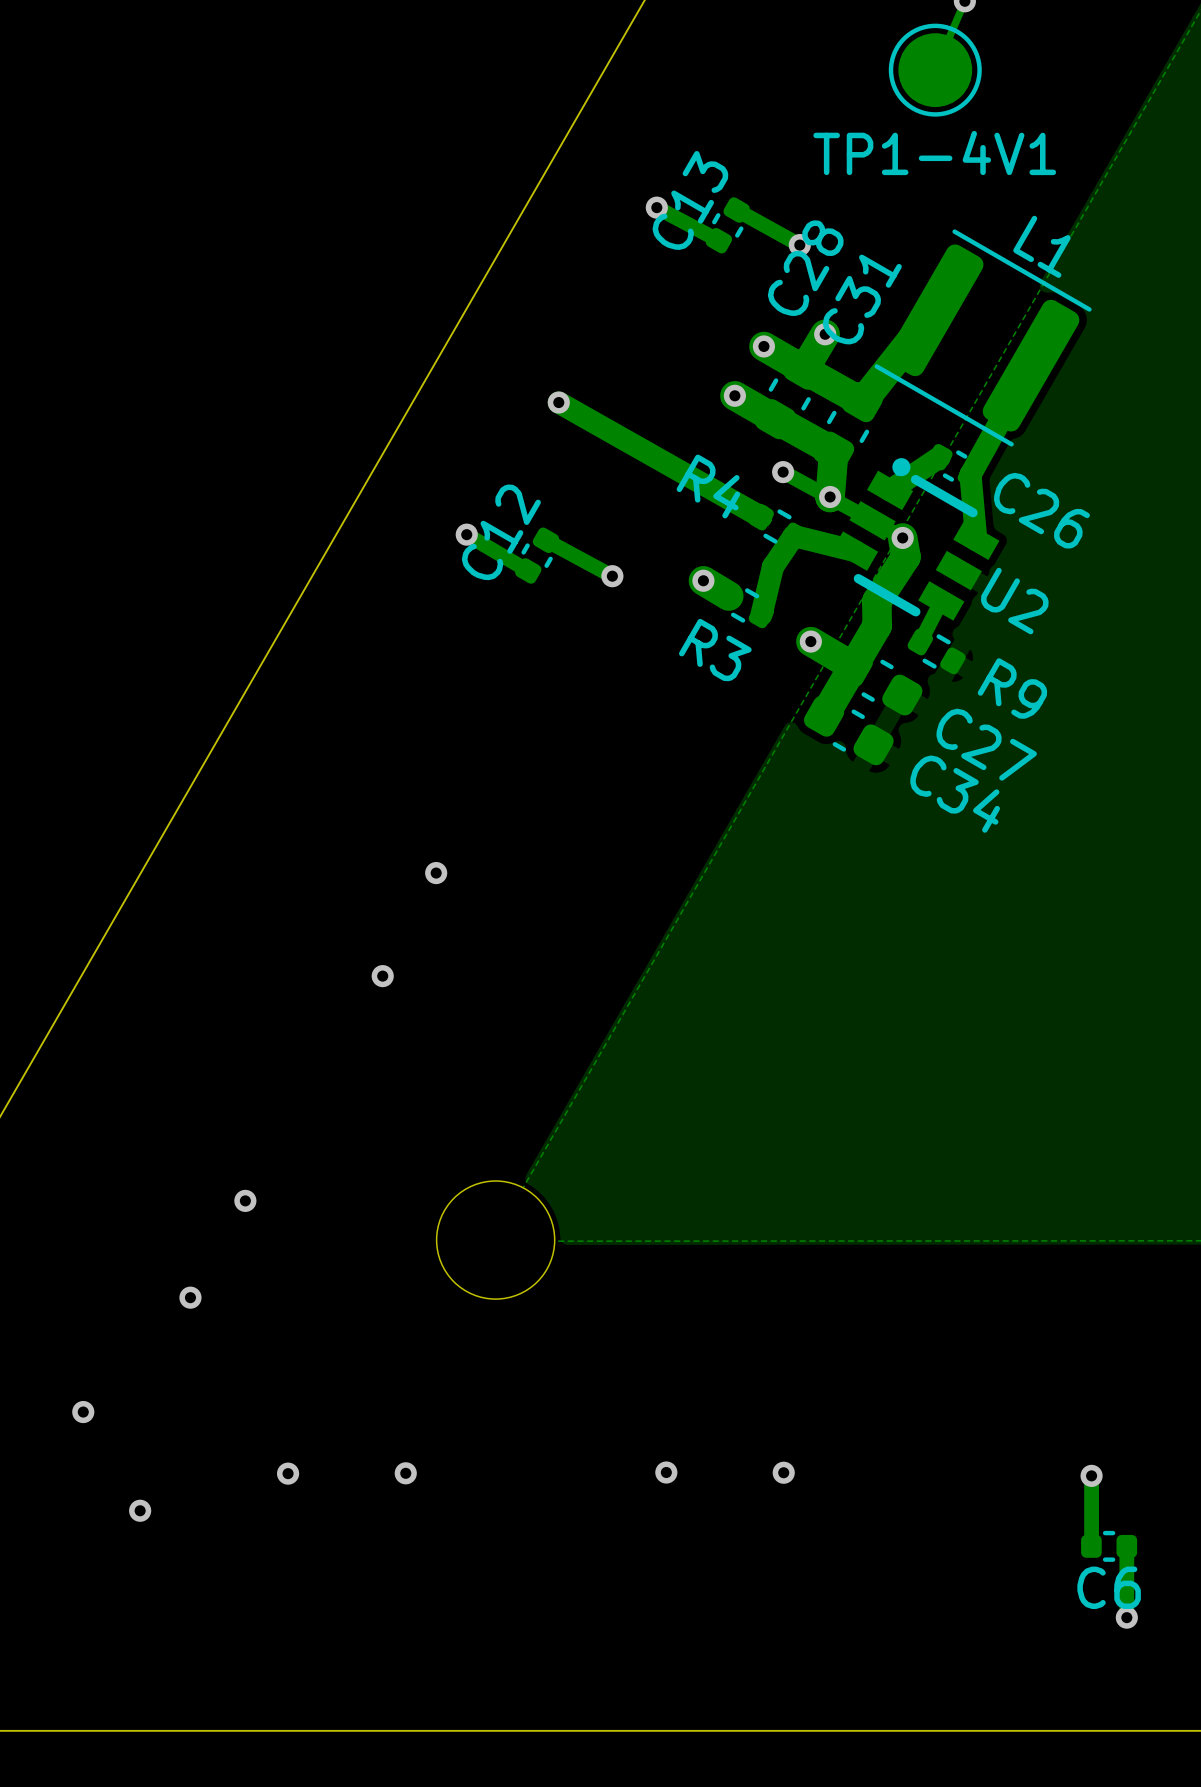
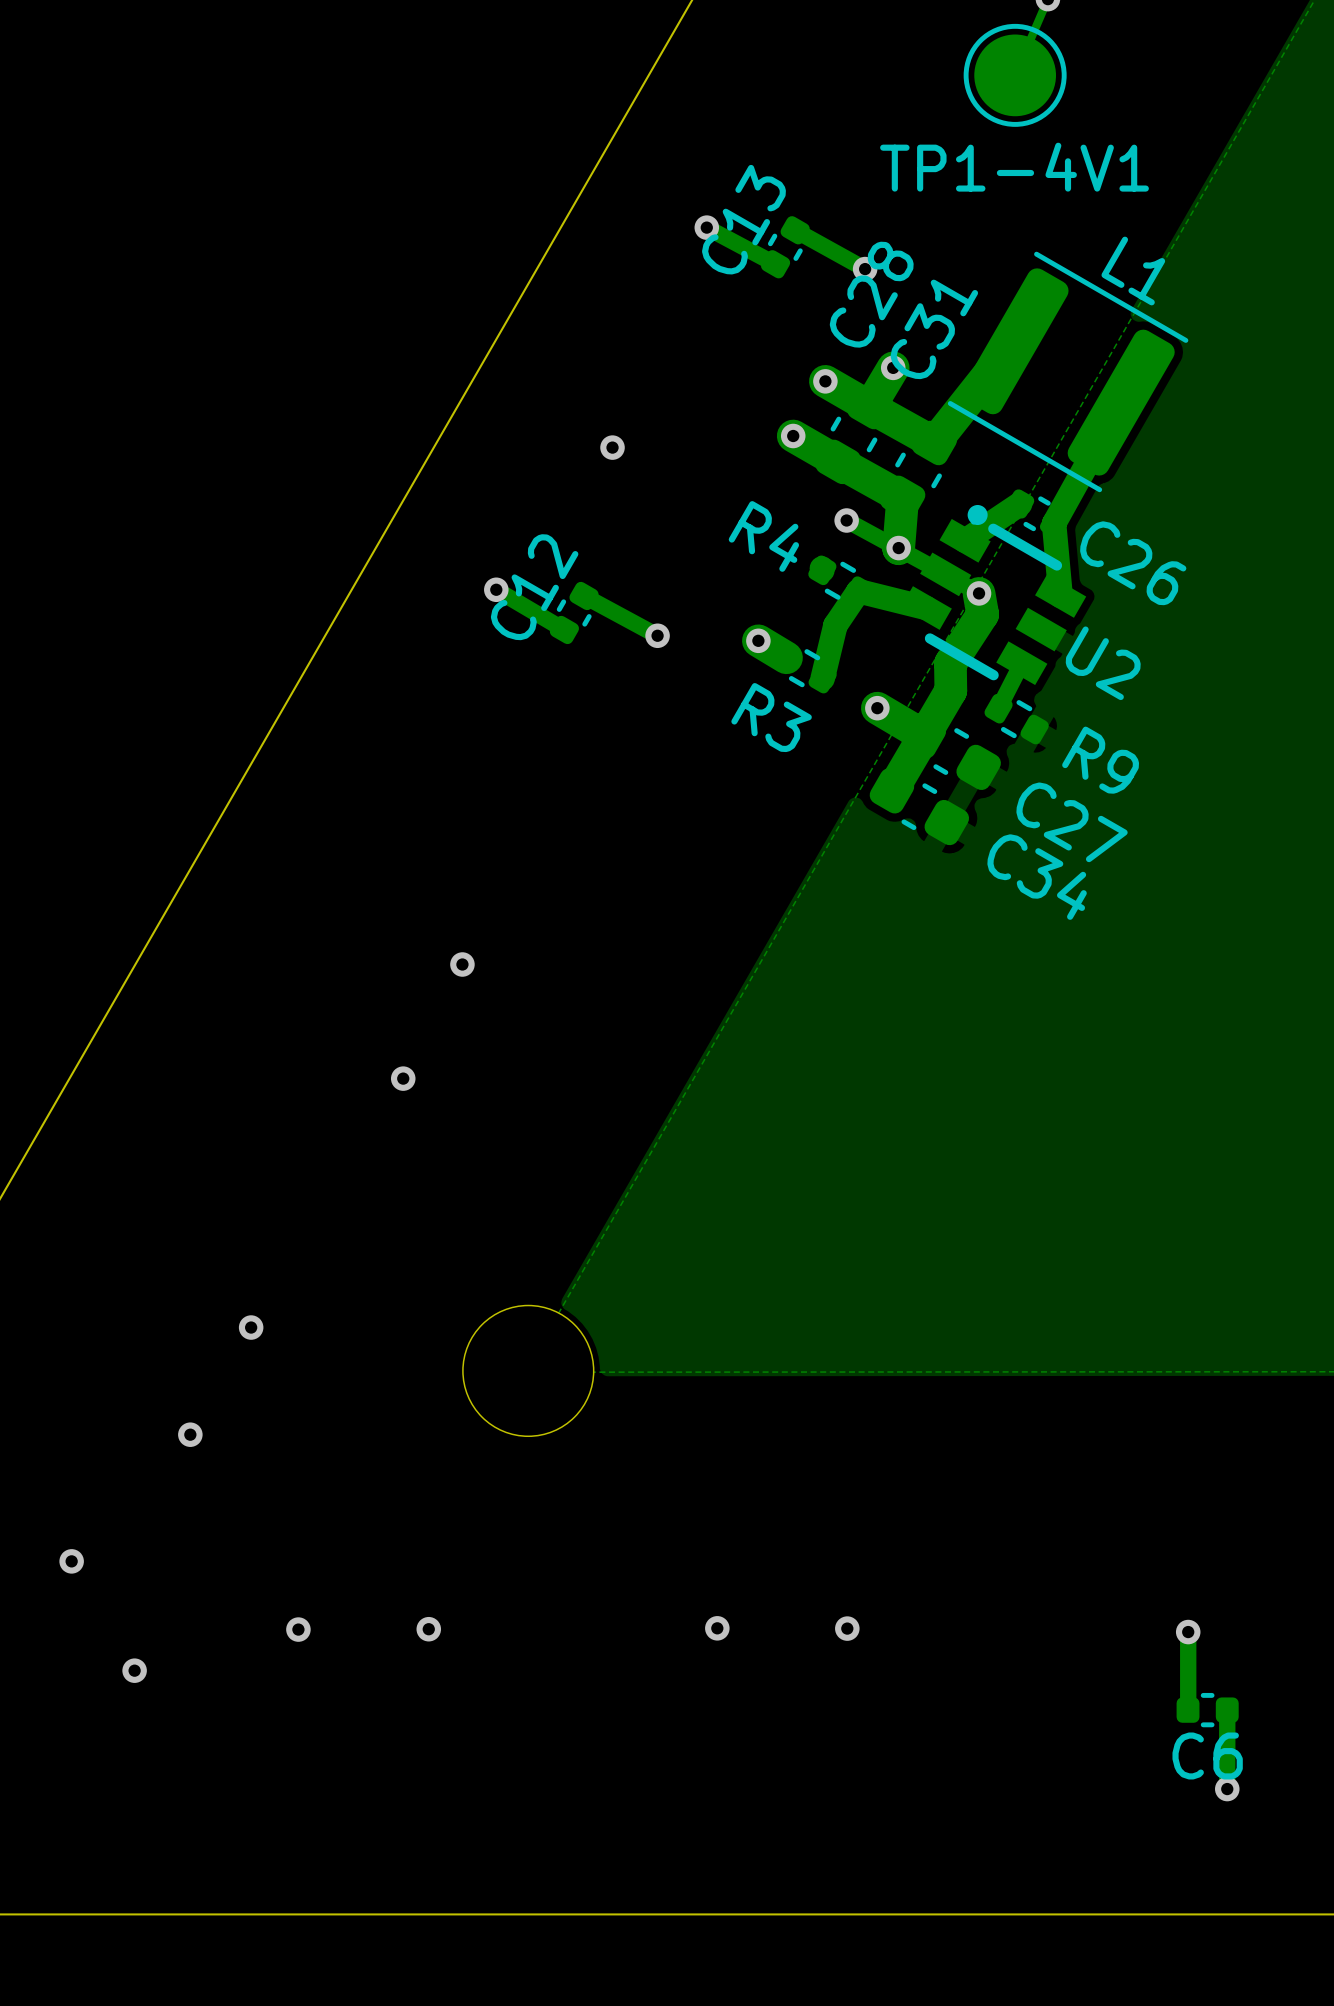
track: (558, 402) (761, 517) -> none
via position: (558, 402) -> (612, 447)

